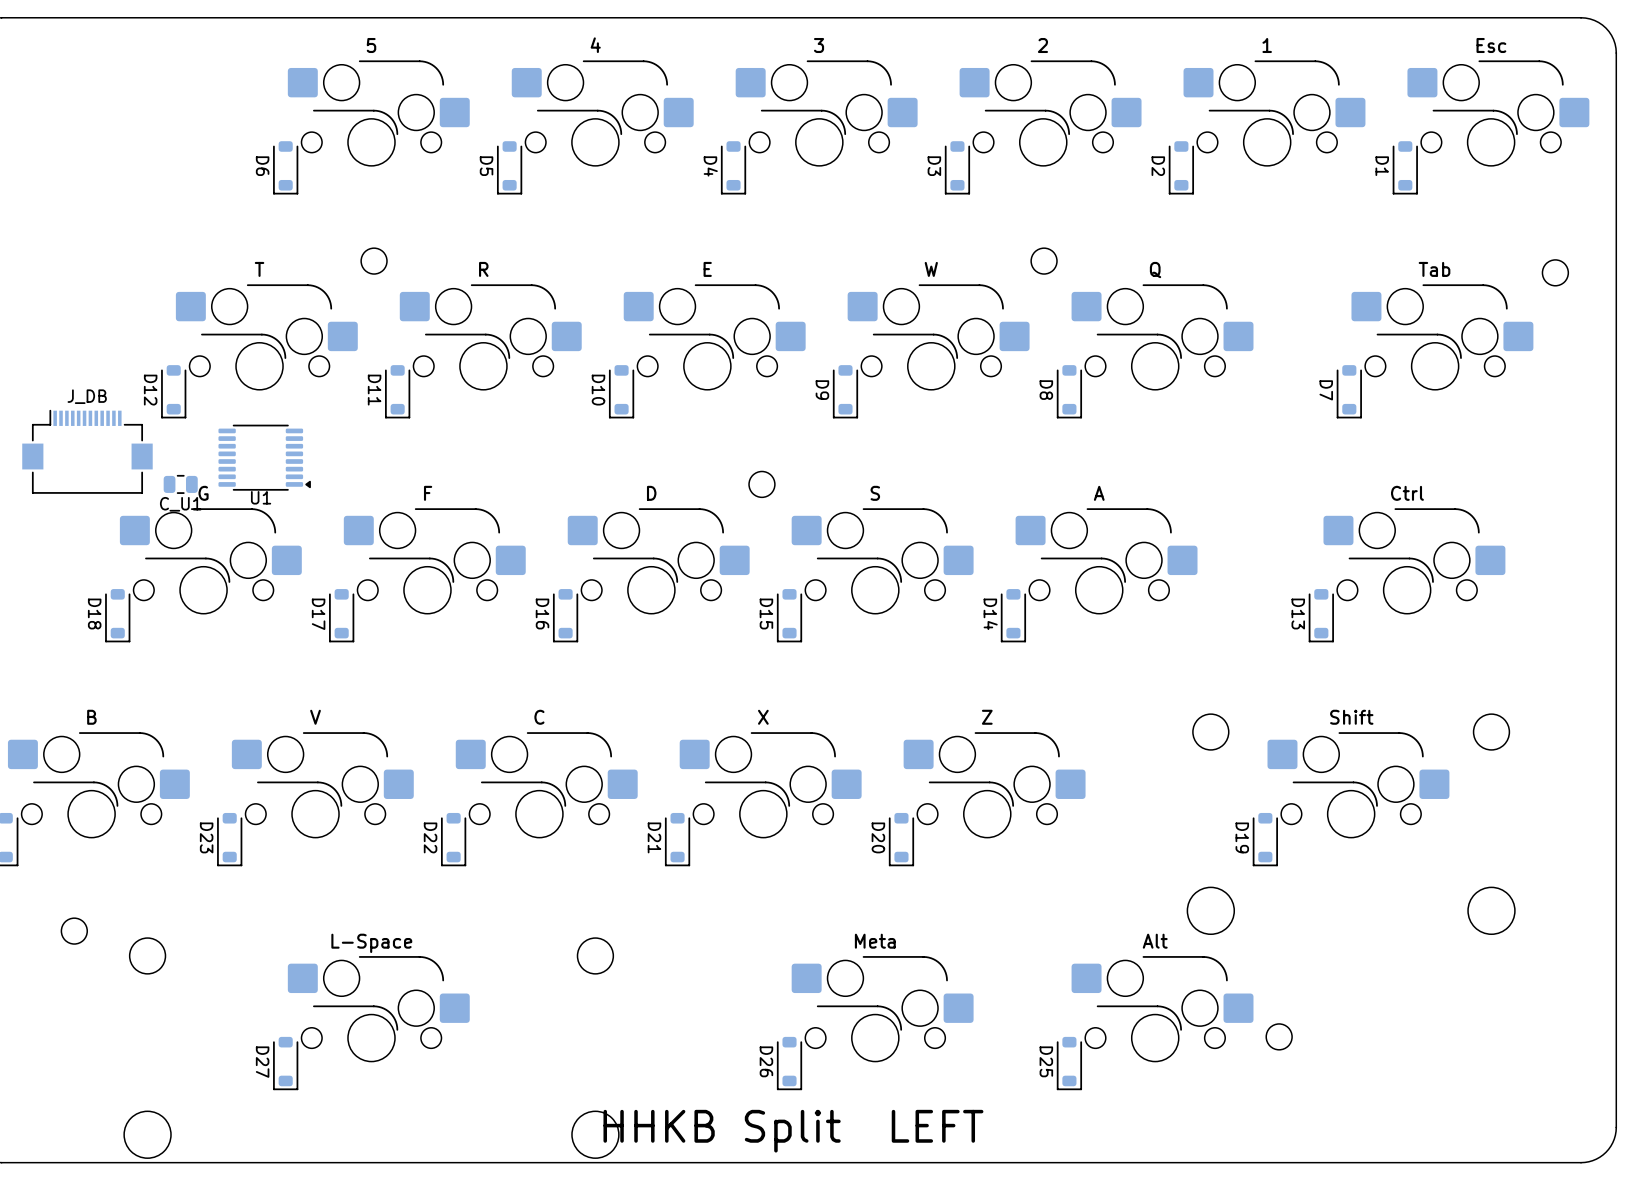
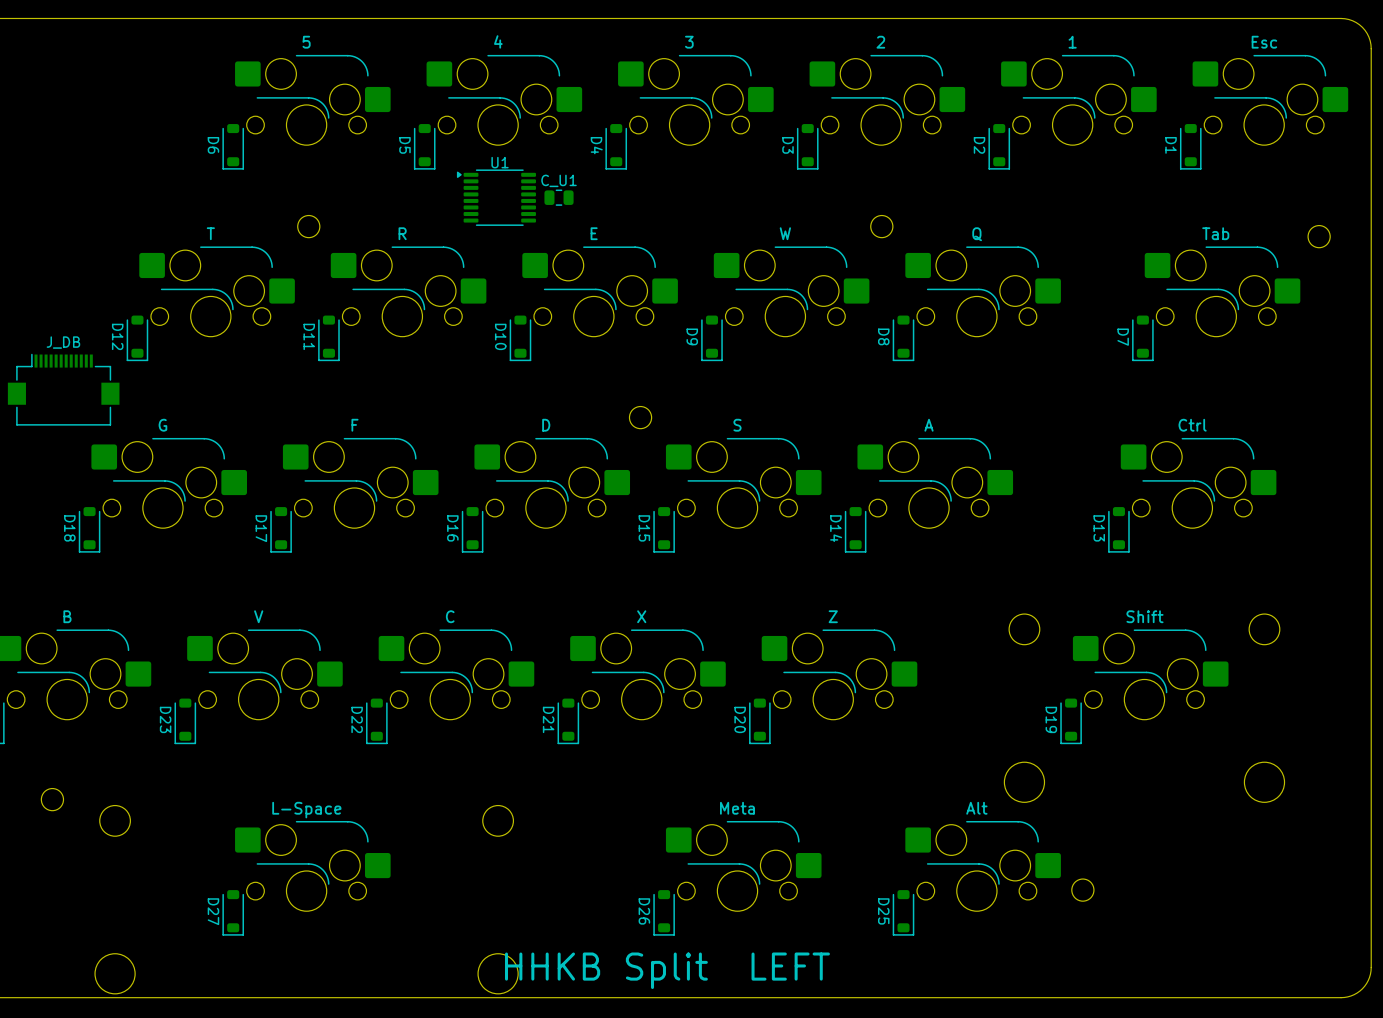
U1 rotation: 0° (264, 457) -> 180° (496, 197)
U1 position: (264, 457) -> (496, 197)
C_U1 position: (180, 484) -> (559, 197)
C_U1 name position: C_U1 (180, 504) -> C_U1 (559, 180)

